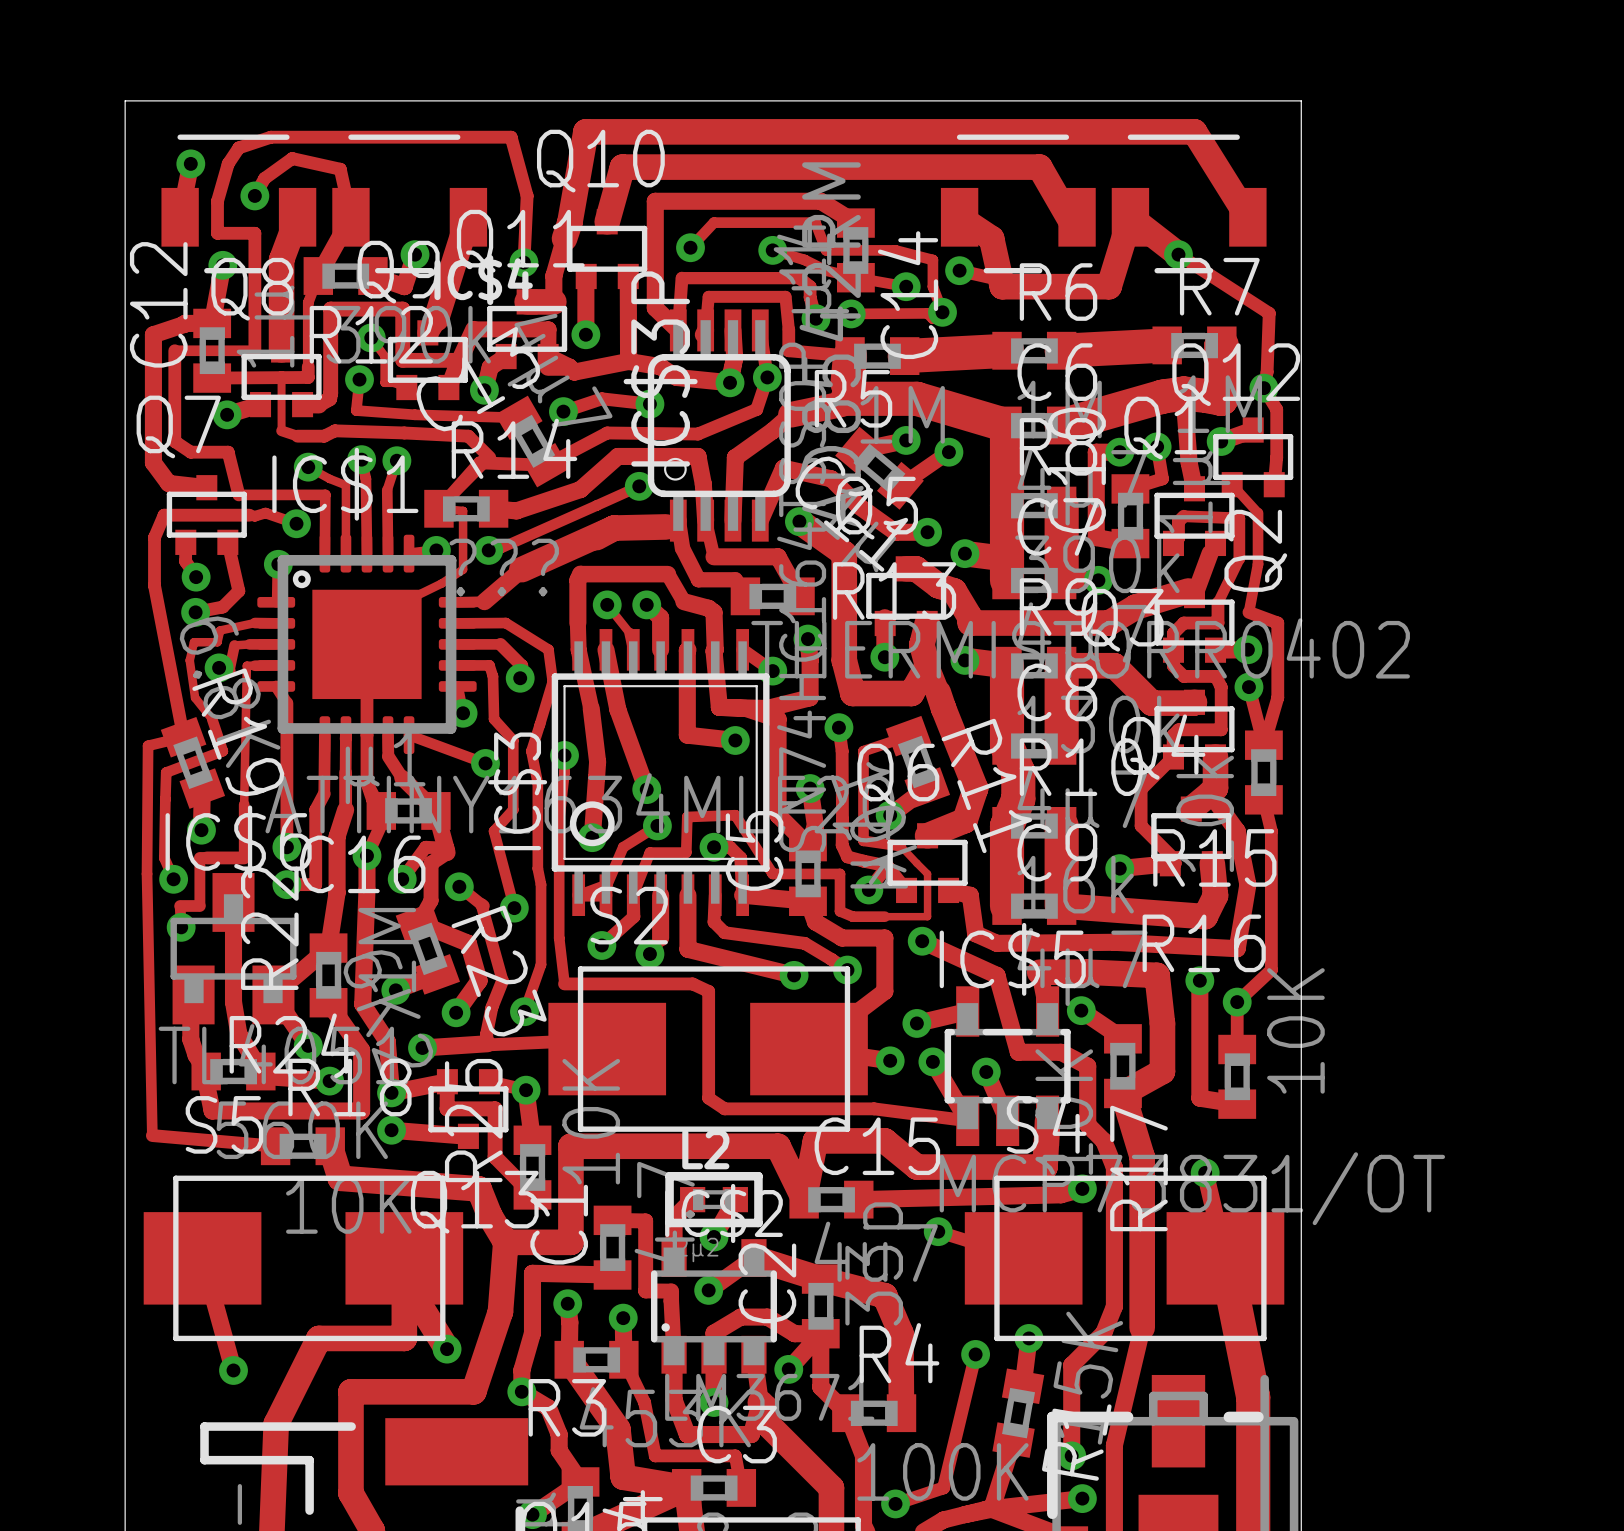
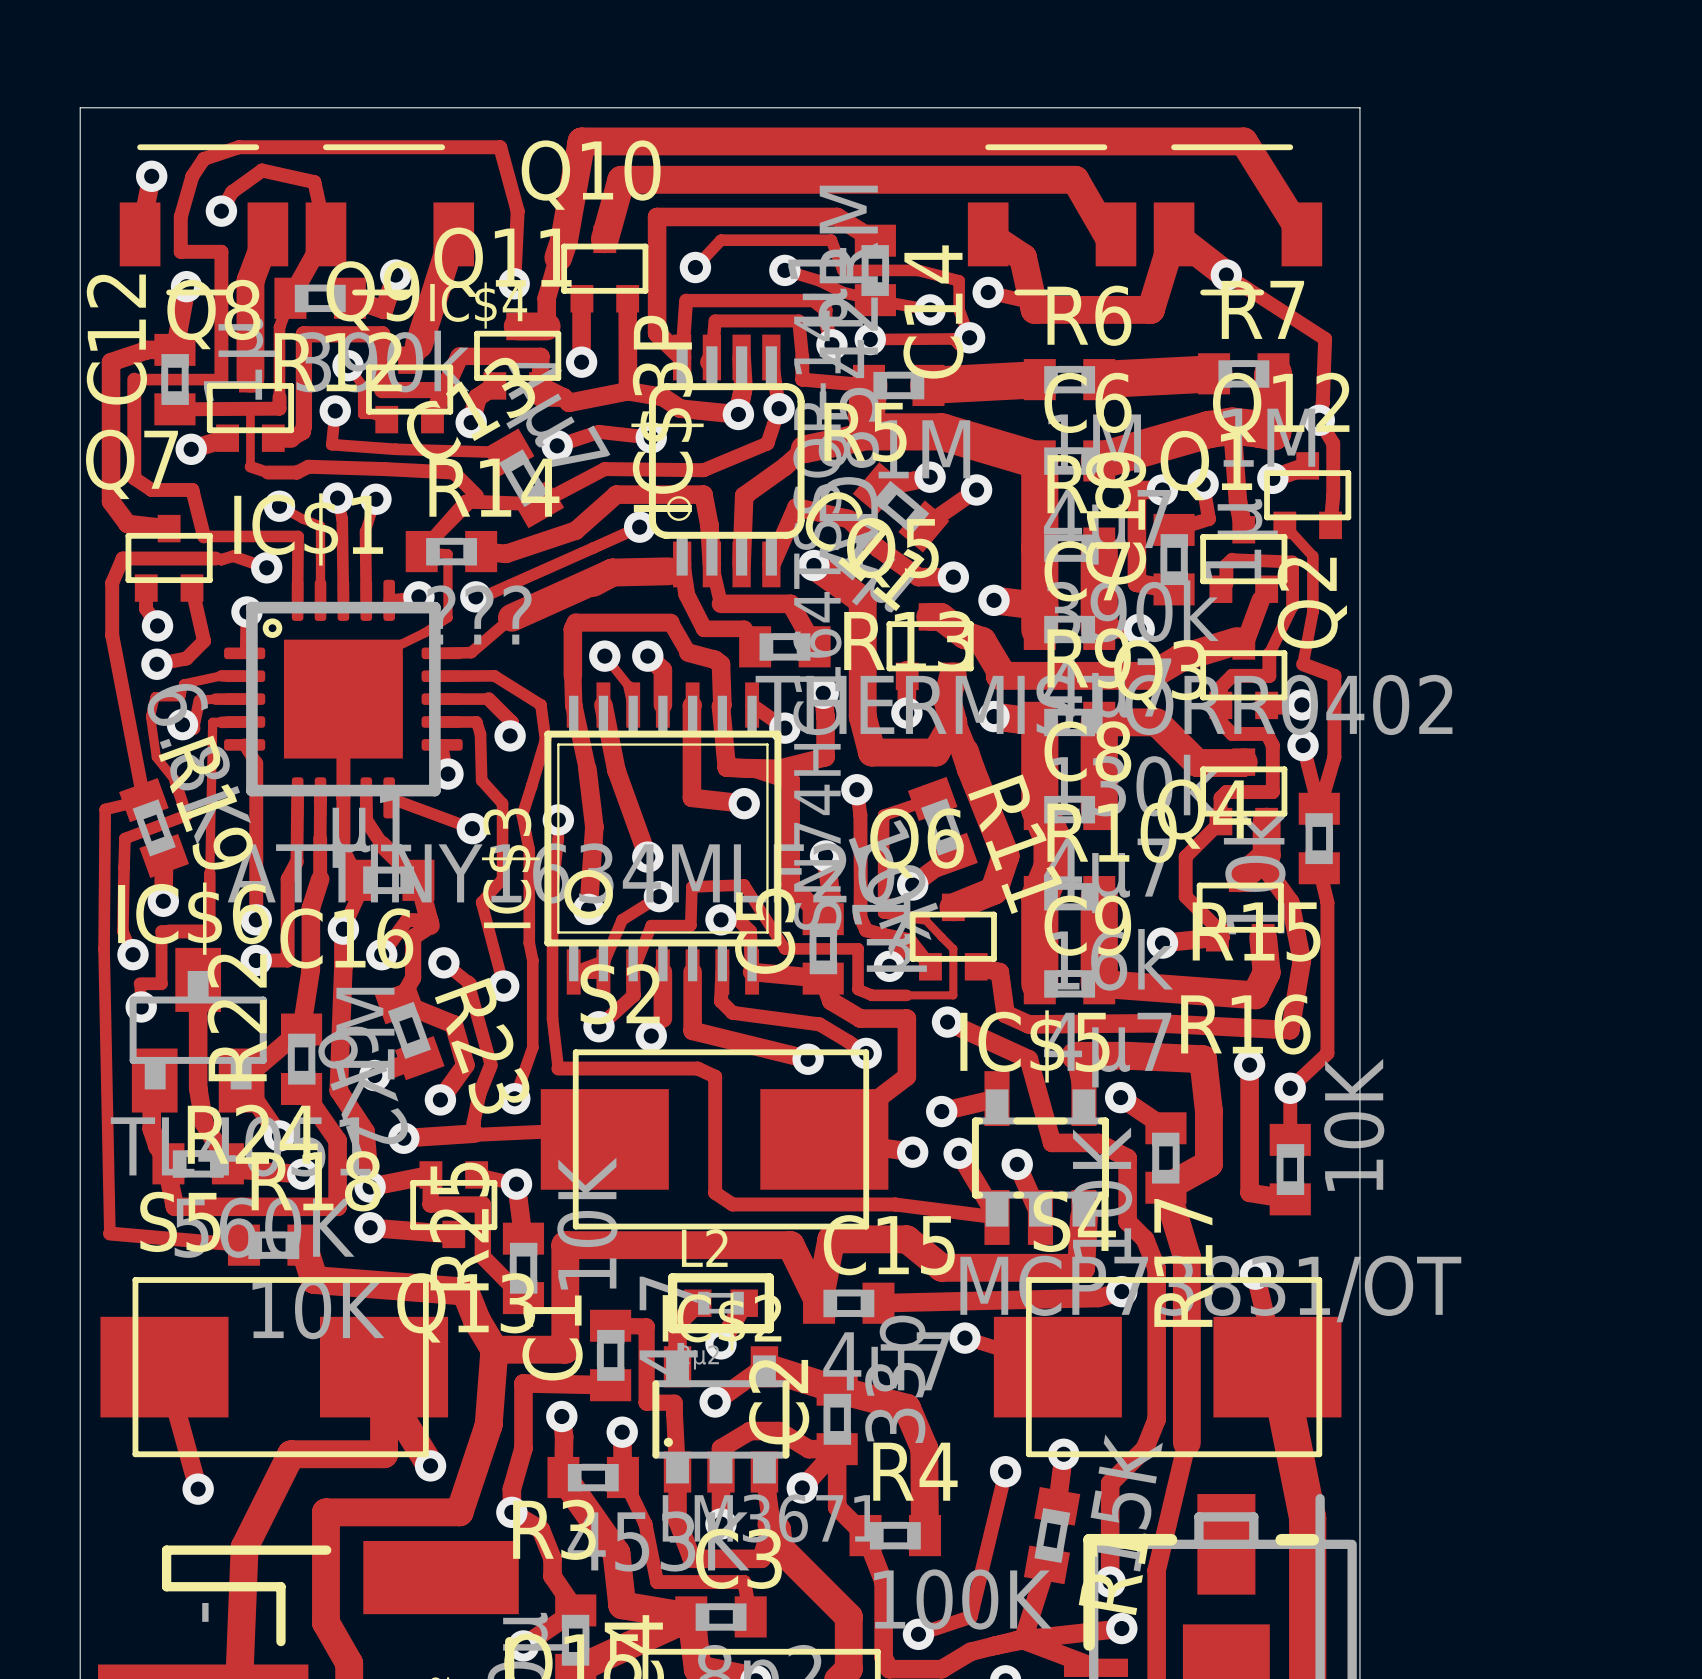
track width: thick (521, 569) (484, 601) -> thin (511, 617) (471, 652)

